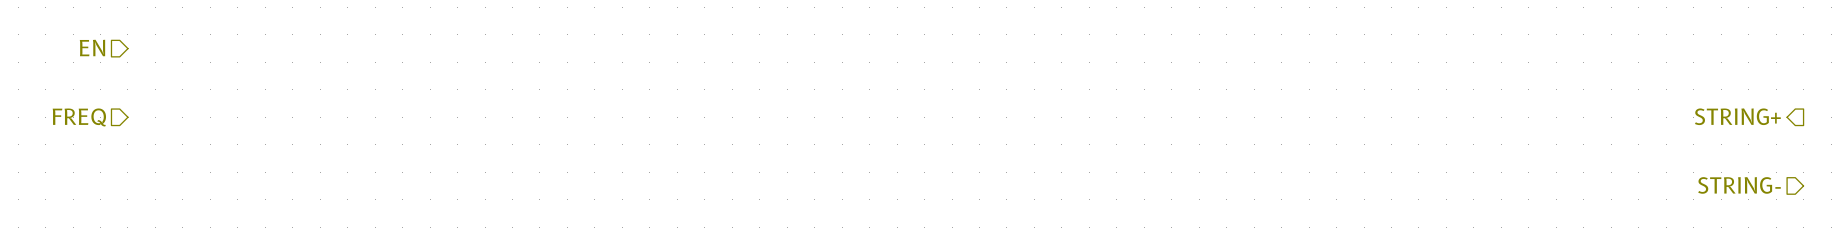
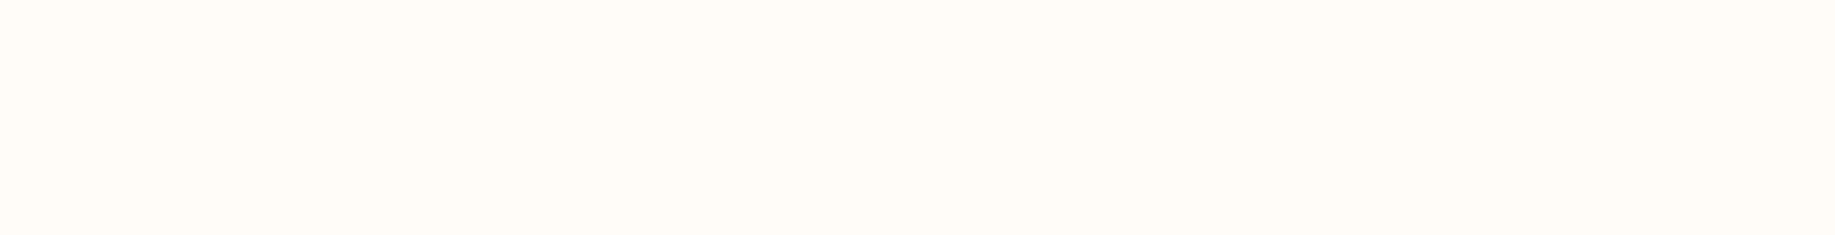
hierarchical label: EN (92, 47) -> none
hierarchical label: STRING+ (1737, 116) -> none
hierarchical label: FREQ (79, 117) -> none
hierarchical label: STRING- (1739, 185) -> none

